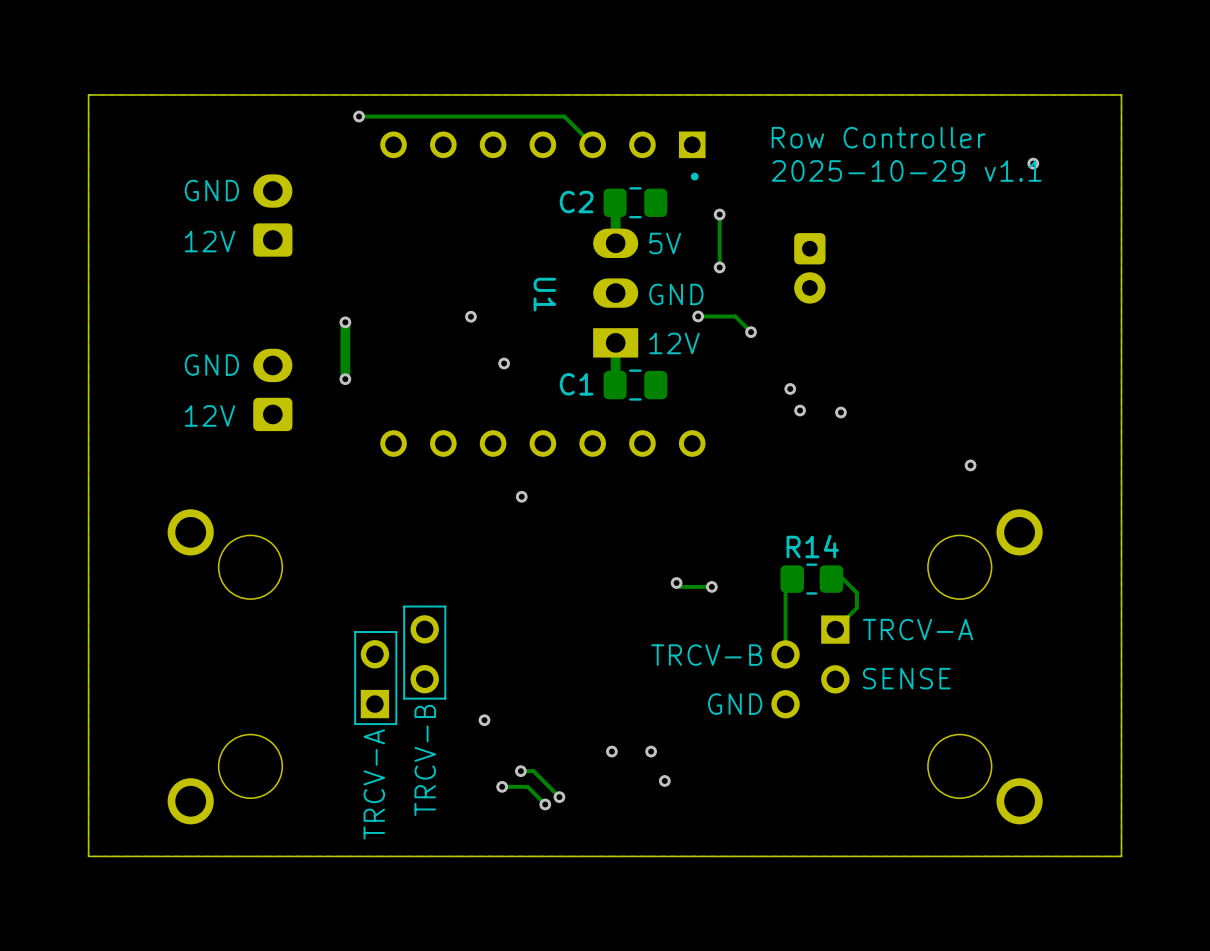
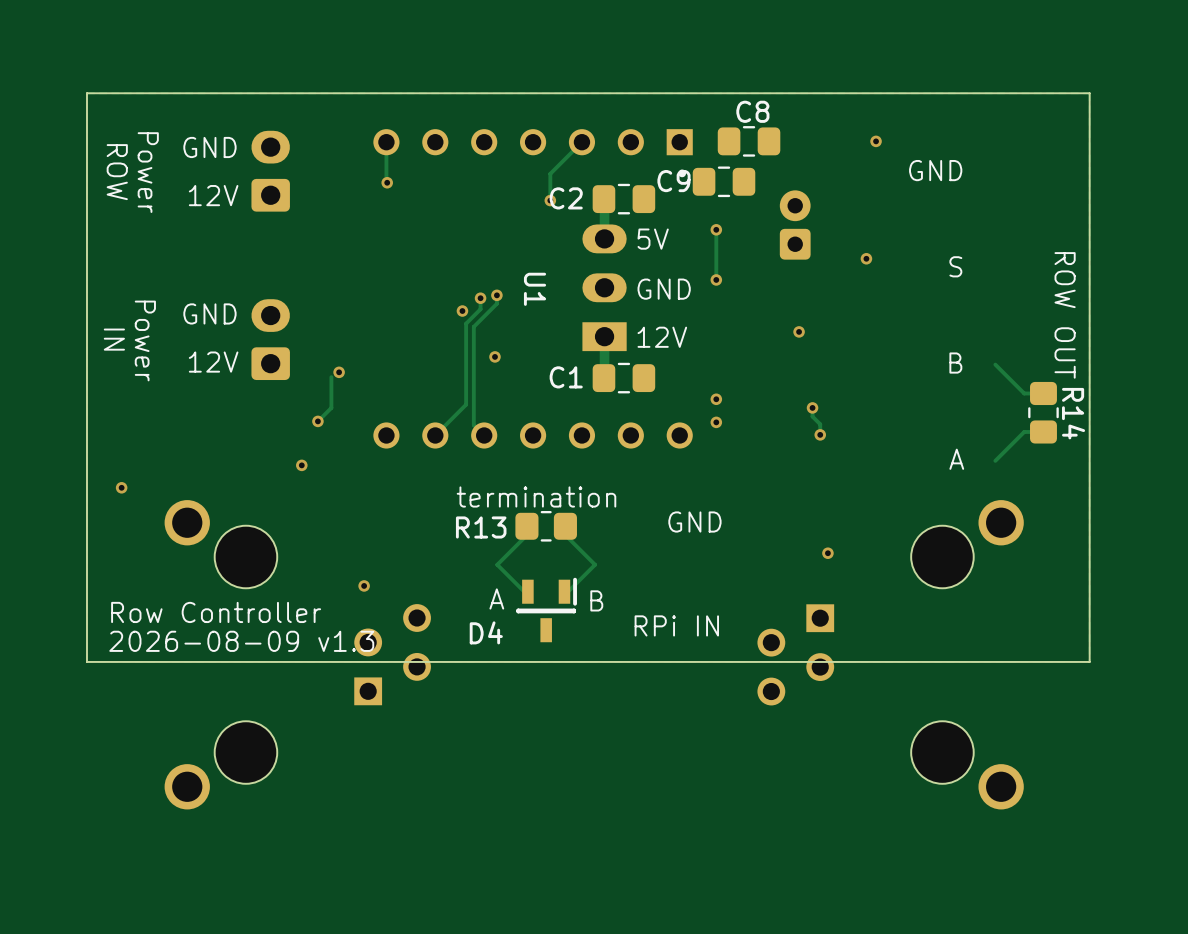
board edge: (1109, 94) (1121, 94) (1121, 856) (88, 856) (88, 674) -> (1089, 93) (1089, 661) (86, 661)
track: (359, 116) (564, 116) (592, 144) -> (550, 200) (550, 173) (581, 142)
via: (359, 116) -> none
text: Row Controller (878, 137) -> none
C8: none -> (749, 141)
via: none -> (876, 141)
track: none -> (386, 142) (387, 182)
via: (1033, 163) -> none
text: 2025-10-29 v1.1 (906, 170) -> none
text: none -> GND (935, 170)
text: none -> ROW (117, 172)
text: none -> Power (148, 172)
C9: none -> (724, 181)
via: none -> (387, 182)
text position: GND (211, 190) -> GND (209, 147)
via: none -> (550, 200)
track: (719, 214) (719, 267) -> none
via: (719, 214) -> none
part position: (272, 215) -> (270, 171)
track: none -> (716, 229) (716, 279)
via: none -> (716, 229)
text position: 12V (210, 241) -> 12V (213, 195)
via: none -> (866, 258)
via: (719, 267) -> none
part rotation: 0° (809, 268) -> 180° (795, 224)
text: none -> S (955, 266)
via: none -> (716, 279)
track: none -> (496, 295) (496, 303) (473, 326) (473, 425) (484, 435)
via: none -> (496, 295)
track: none -> (480, 298) (480, 309) (466, 323) (466, 404) (435, 435)
via: none -> (480, 298)
track: (698, 316) (735, 316) (751, 332) -> none
via: (698, 316) -> none
text: none -> ROW OUT (1065, 315)
track: (345, 322) (345, 379) -> none
via: (345, 322) -> none
via: (751, 332) -> none
via: none -> (799, 331)
text: none -> IN (114, 339)
text: none -> Power (145, 340)
text position: GND (211, 365) -> GND (209, 313)
text: none -> B (955, 363)
track: none -> (995, 364) (1024, 393) (1043, 393)
track: none -> (331, 377) (331, 407) (317, 421)
via: (790, 388) -> none
part position: (272, 389) -> (270, 339)
via: none -> (716, 399)
via: (800, 410) -> none
via: (840, 412) -> none
text position: 12V (210, 415) -> 12V (213, 362)
track: none -> (812, 407) (812, 416) (820, 424) (820, 434)
via: none -> (812, 407)
via: none -> (317, 421)
via: none -> (716, 422)
track: none -> (1043, 431) (1024, 431) (995, 460)
via: none -> (820, 434)
via: (970, 465) -> none
text: none -> A (956, 459)
via: none -> (301, 465)
via: none -> (121, 487)
via: (521, 496) -> none
text: none -> termination (536, 496)
track: none -> (526, 526) (526, 535) (497, 564) (524, 591) (527, 591)
R13: none -> (546, 526)
track: none -> (565, 526) (565, 535) (595, 564) (568, 591) (564, 591)
via: none -> (827, 553)
track: (792, 579) (785, 585) (785, 654) -> none
R14 rotation: 0° (811, 579) -> 90° clockwise (1043, 412)
R14 position: (811, 579) -> (1043, 412)
track: (831, 579) (843, 579) (856, 592) (856, 608) (835, 629) -> none
track: (676, 583) (680, 586) (711, 586) -> none
via: (676, 583) -> none
via: (711, 586) -> none
via: none -> (364, 585)
line: (445, 606) (404, 606) (404, 698) (445, 698) (445, 606) -> none
text: none -> A (496, 598)
text: none -> B (596, 600)
D4: none -> (546, 610)
text: none -> Row Controller (216, 612)
text: TRCV-A (918, 629) -> none
line: (396, 632) (355, 632) (355, 724) (396, 724) (396, 632) -> none
text: none -> 2026-08-09 v1.3 (241, 641)
text: TRCV-B (706, 655) -> RPi IN (676, 625)
text: SENSE (906, 678) -> none
text position: GND (735, 704) -> GND (694, 522)
via: (484, 720) -> none
via: (611, 751) -> none
via: (651, 751) -> none
text: TRCV-B (425, 760) -> none
track: (520, 771) (533, 771) (559, 797) -> none
via: (520, 771) -> none
via: (664, 780) -> none
text: TRCV-A (374, 784) -> none
track: (502, 786) (527, 786) (545, 804) -> none
via: (502, 786) -> none
via: (559, 797) -> none
via: (545, 804) -> none

